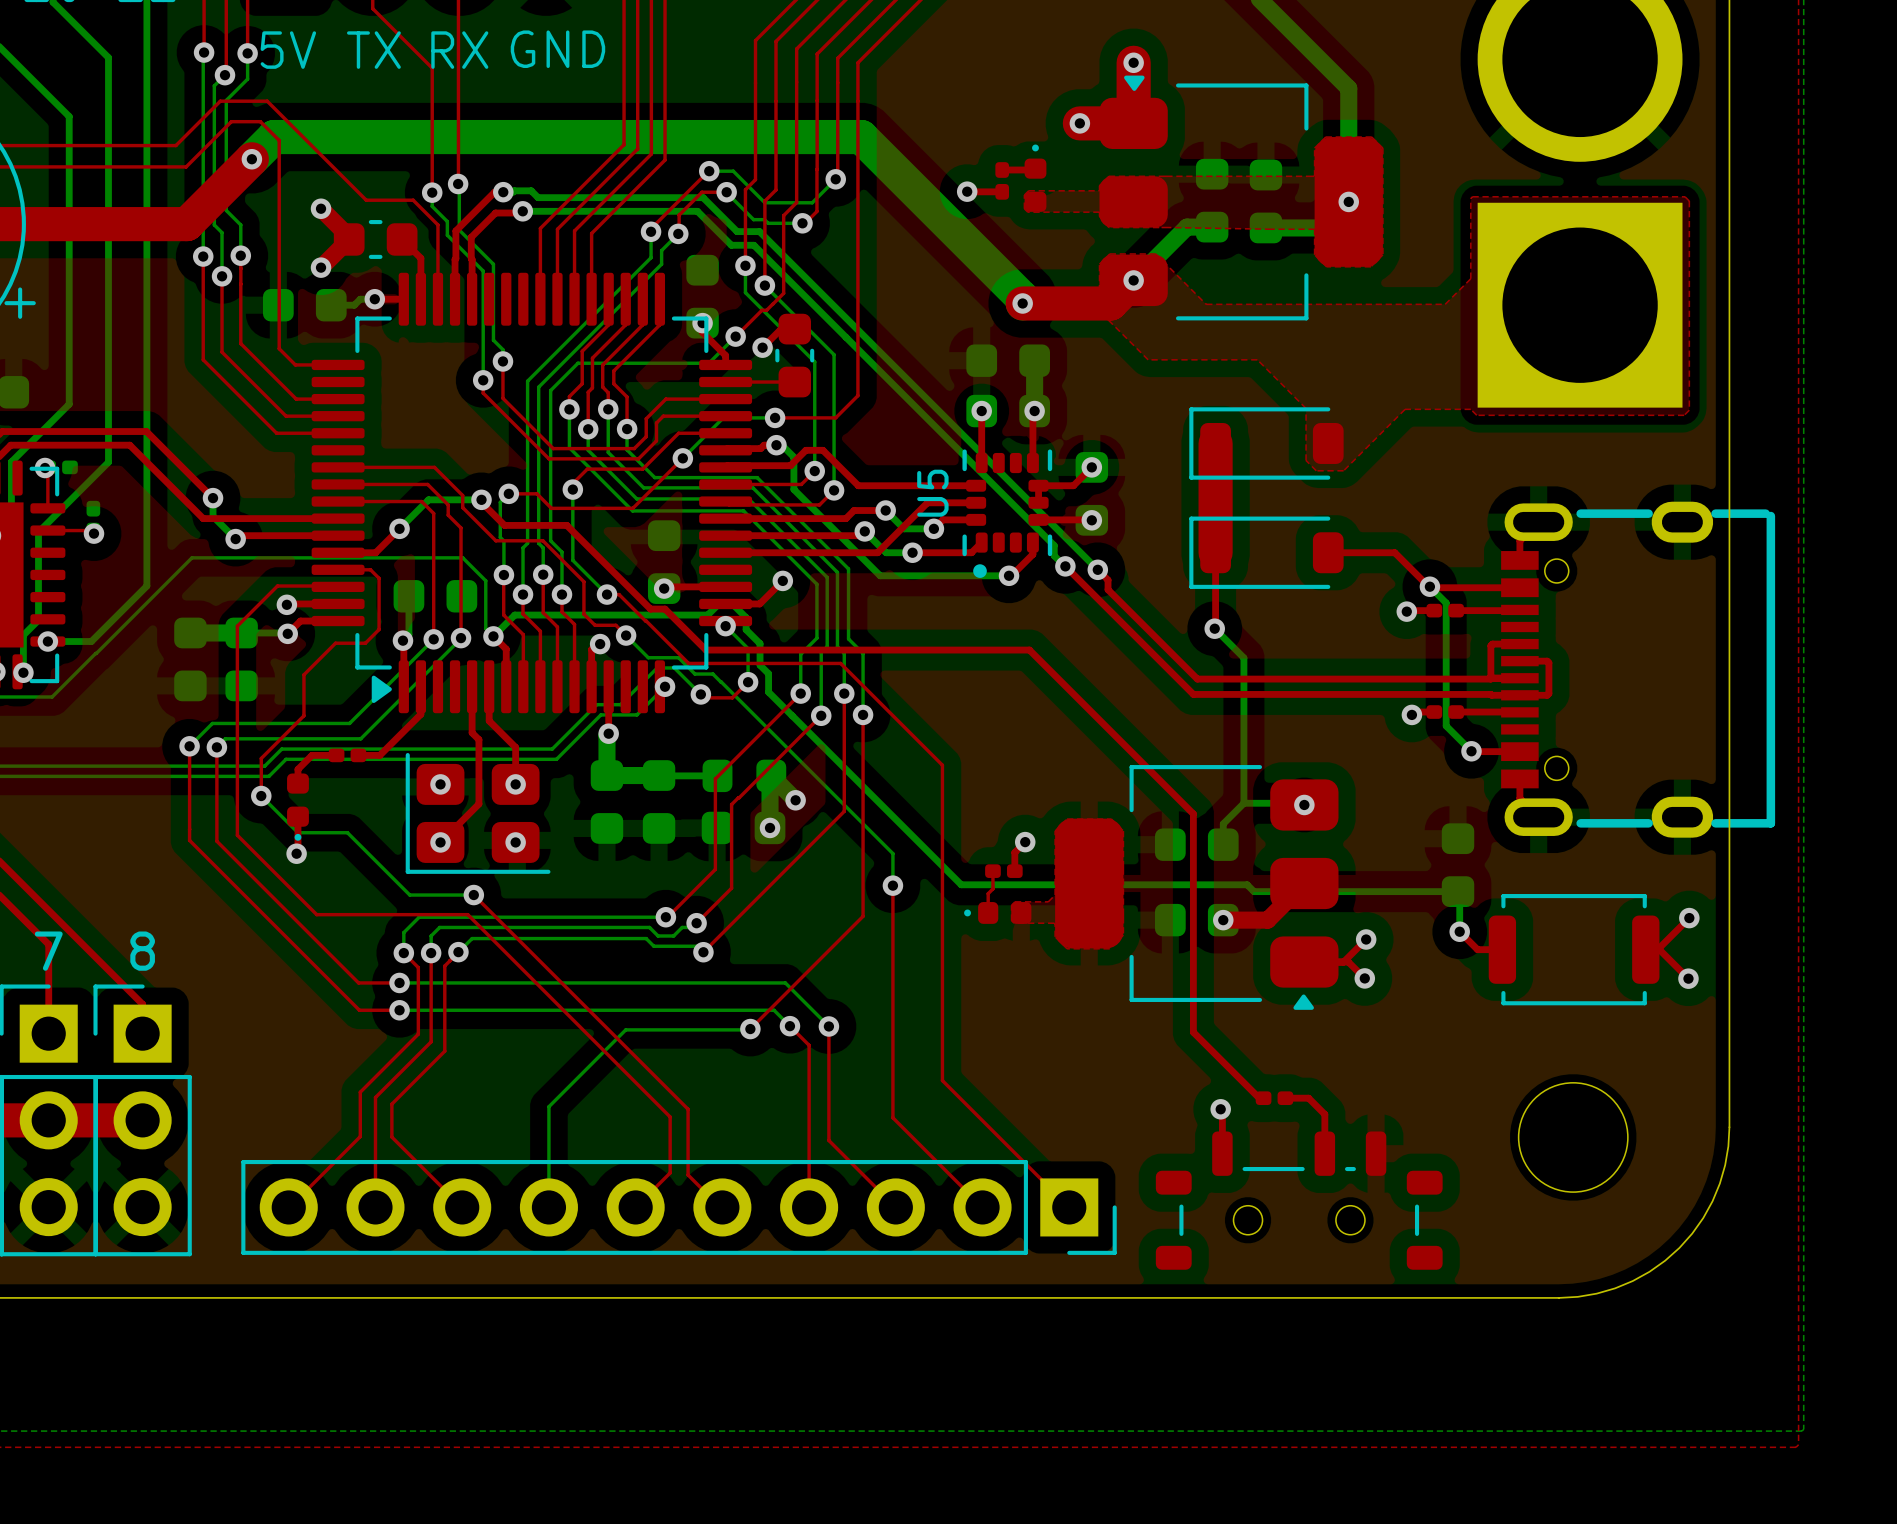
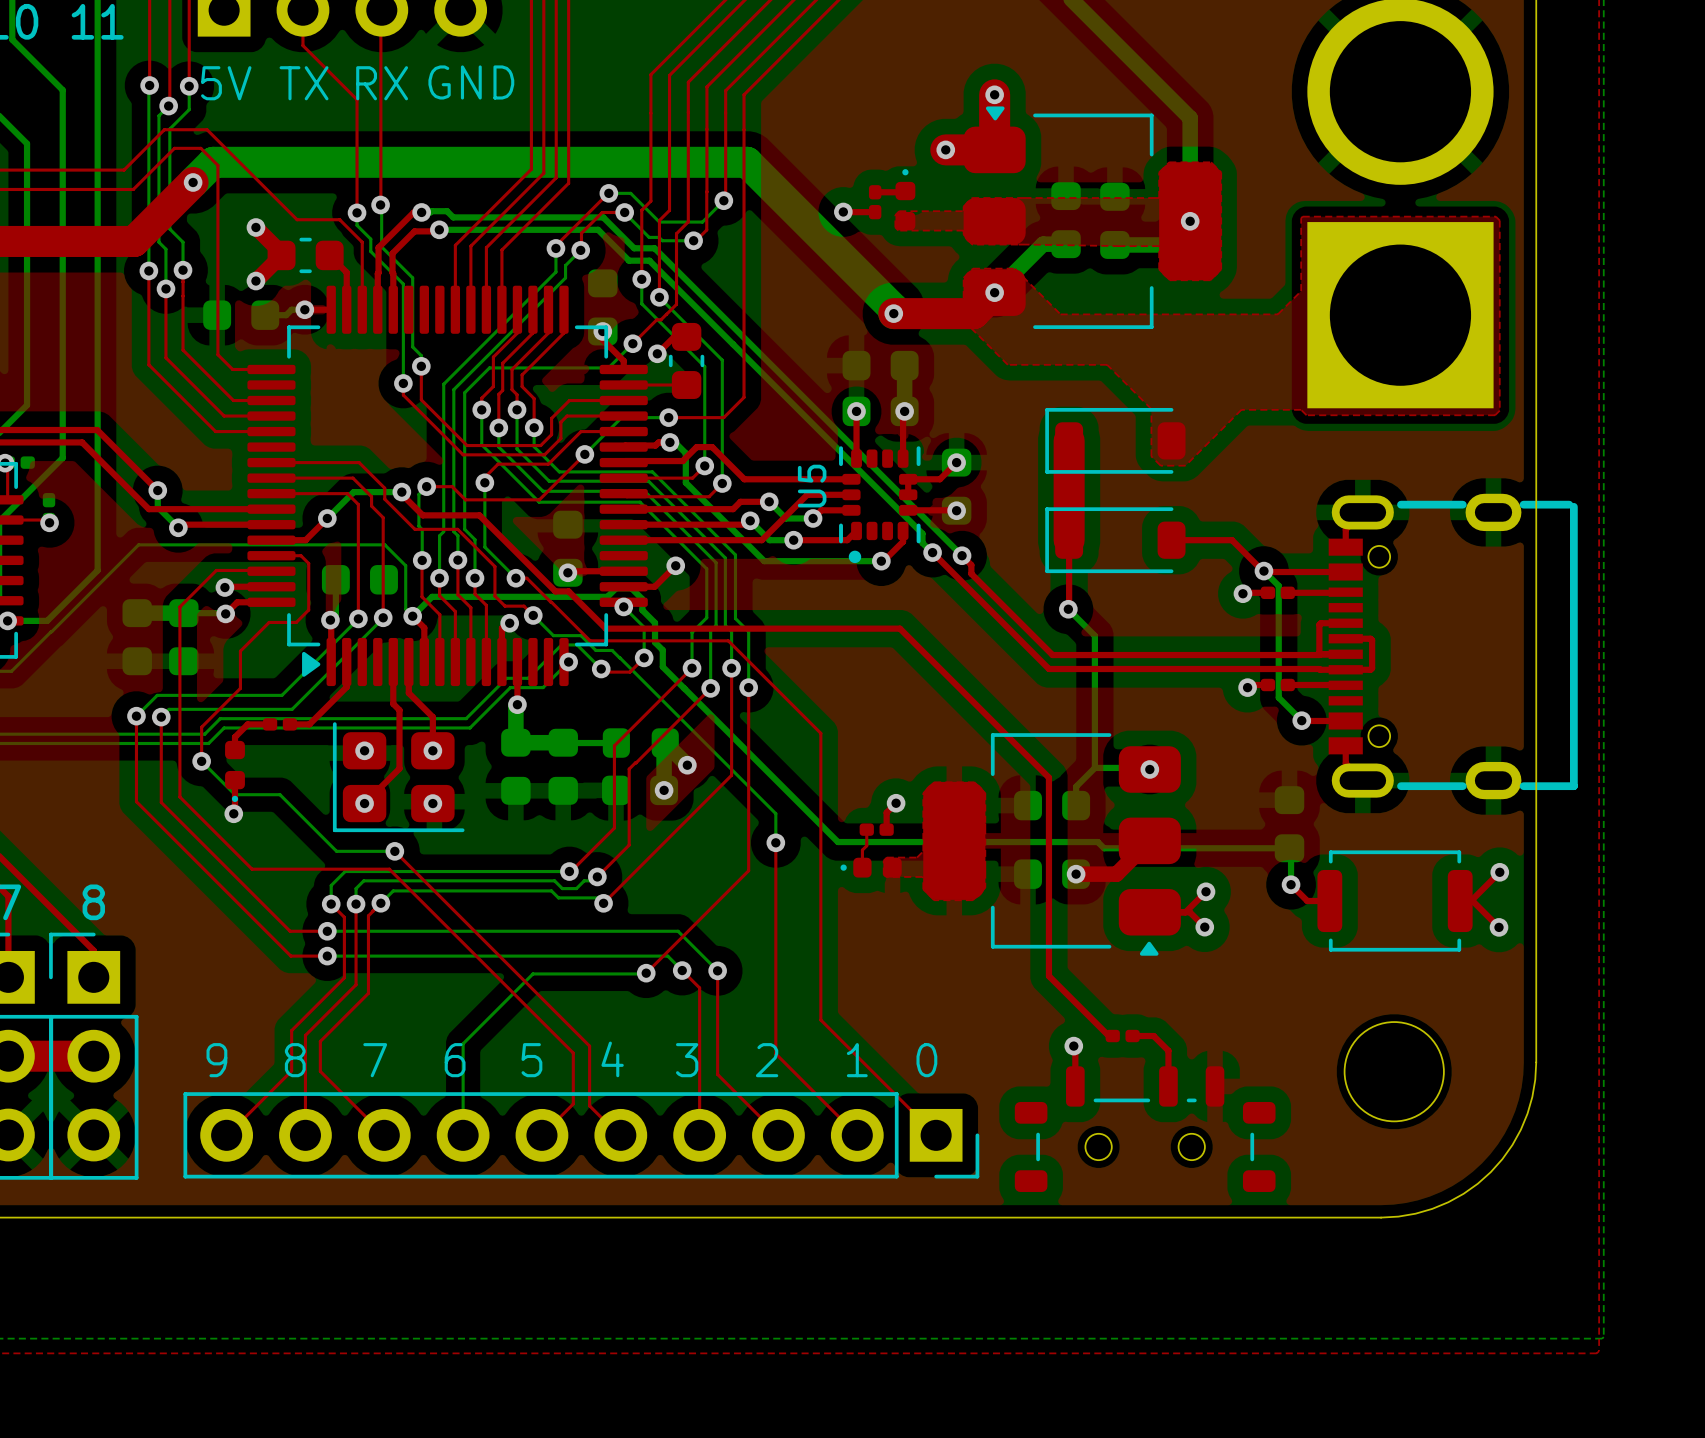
text: none -> 4 (612, 1059)
text: none -> 9 (216, 1060)
text: none -> 8 (295, 1060)
text: none -> 7 (375, 1060)
text: none -> 6 (455, 1060)
text: none -> 5 (531, 1060)
text: none -> 3 (687, 1060)
text: none -> 2 (767, 1060)
text: none -> 1 (857, 1060)
text: none -> 0 (926, 1060)

